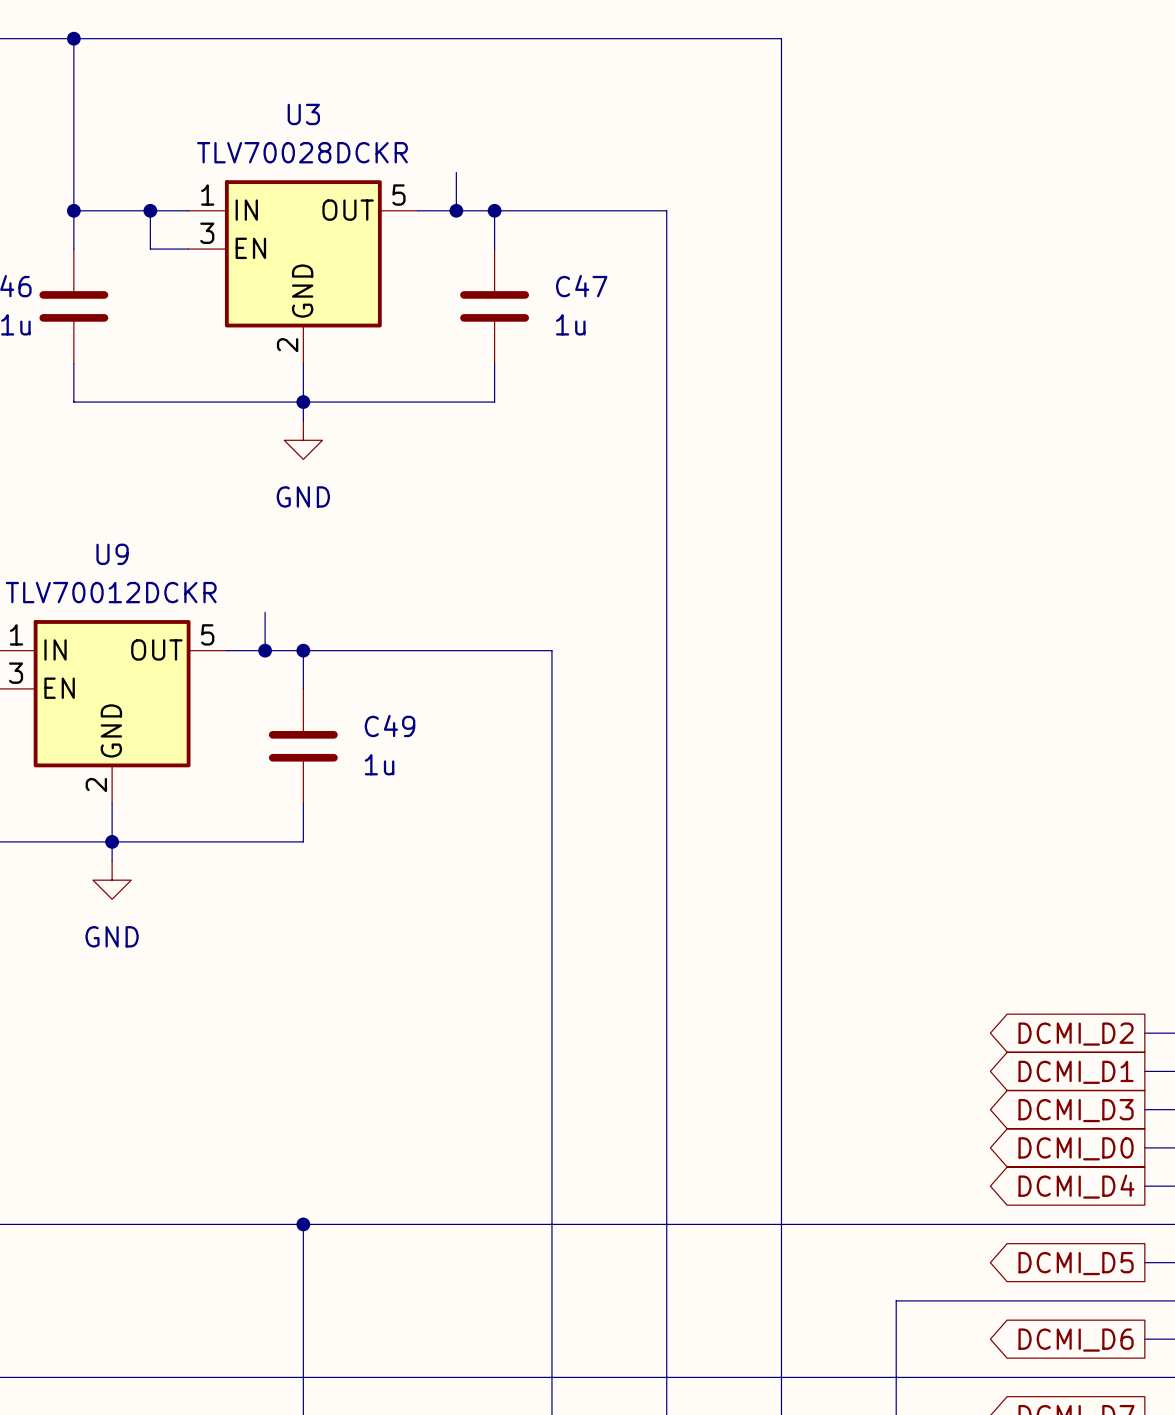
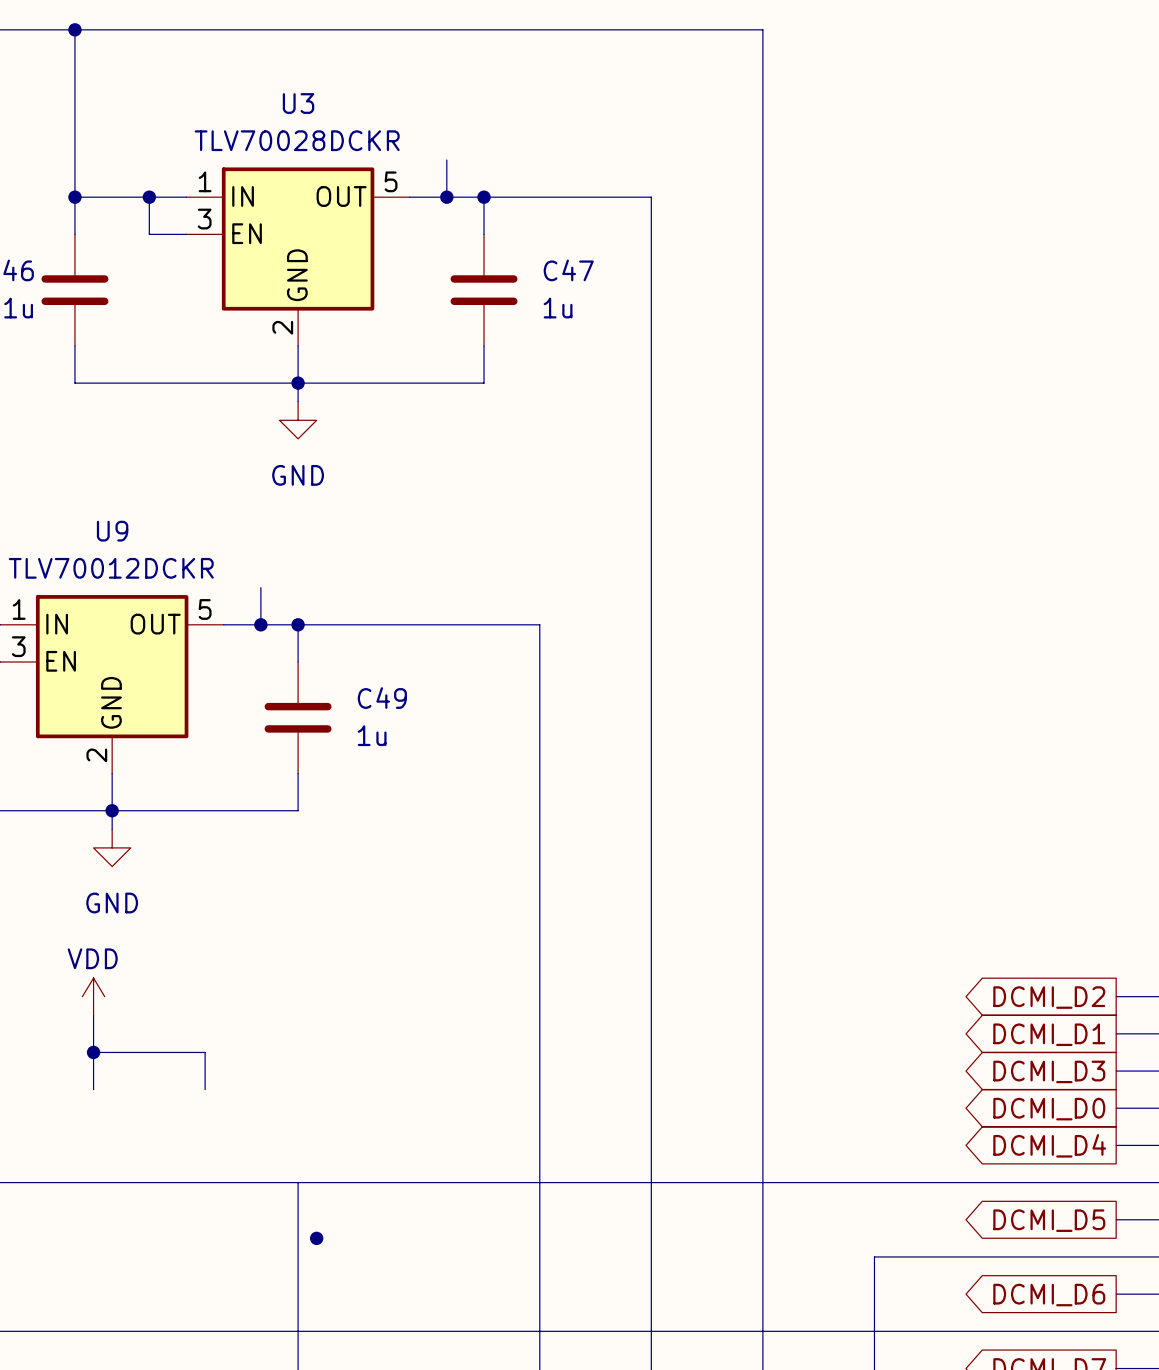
power symbol: none -> VDD (93, 996)
wire: none -> (93, 1015) (93, 1089)
wire: none -> (93, 1052) (205, 1052) (205, 1089)
junction: none -> (93, 1052)
junction position: (303, 1224) -> (316, 1238)

